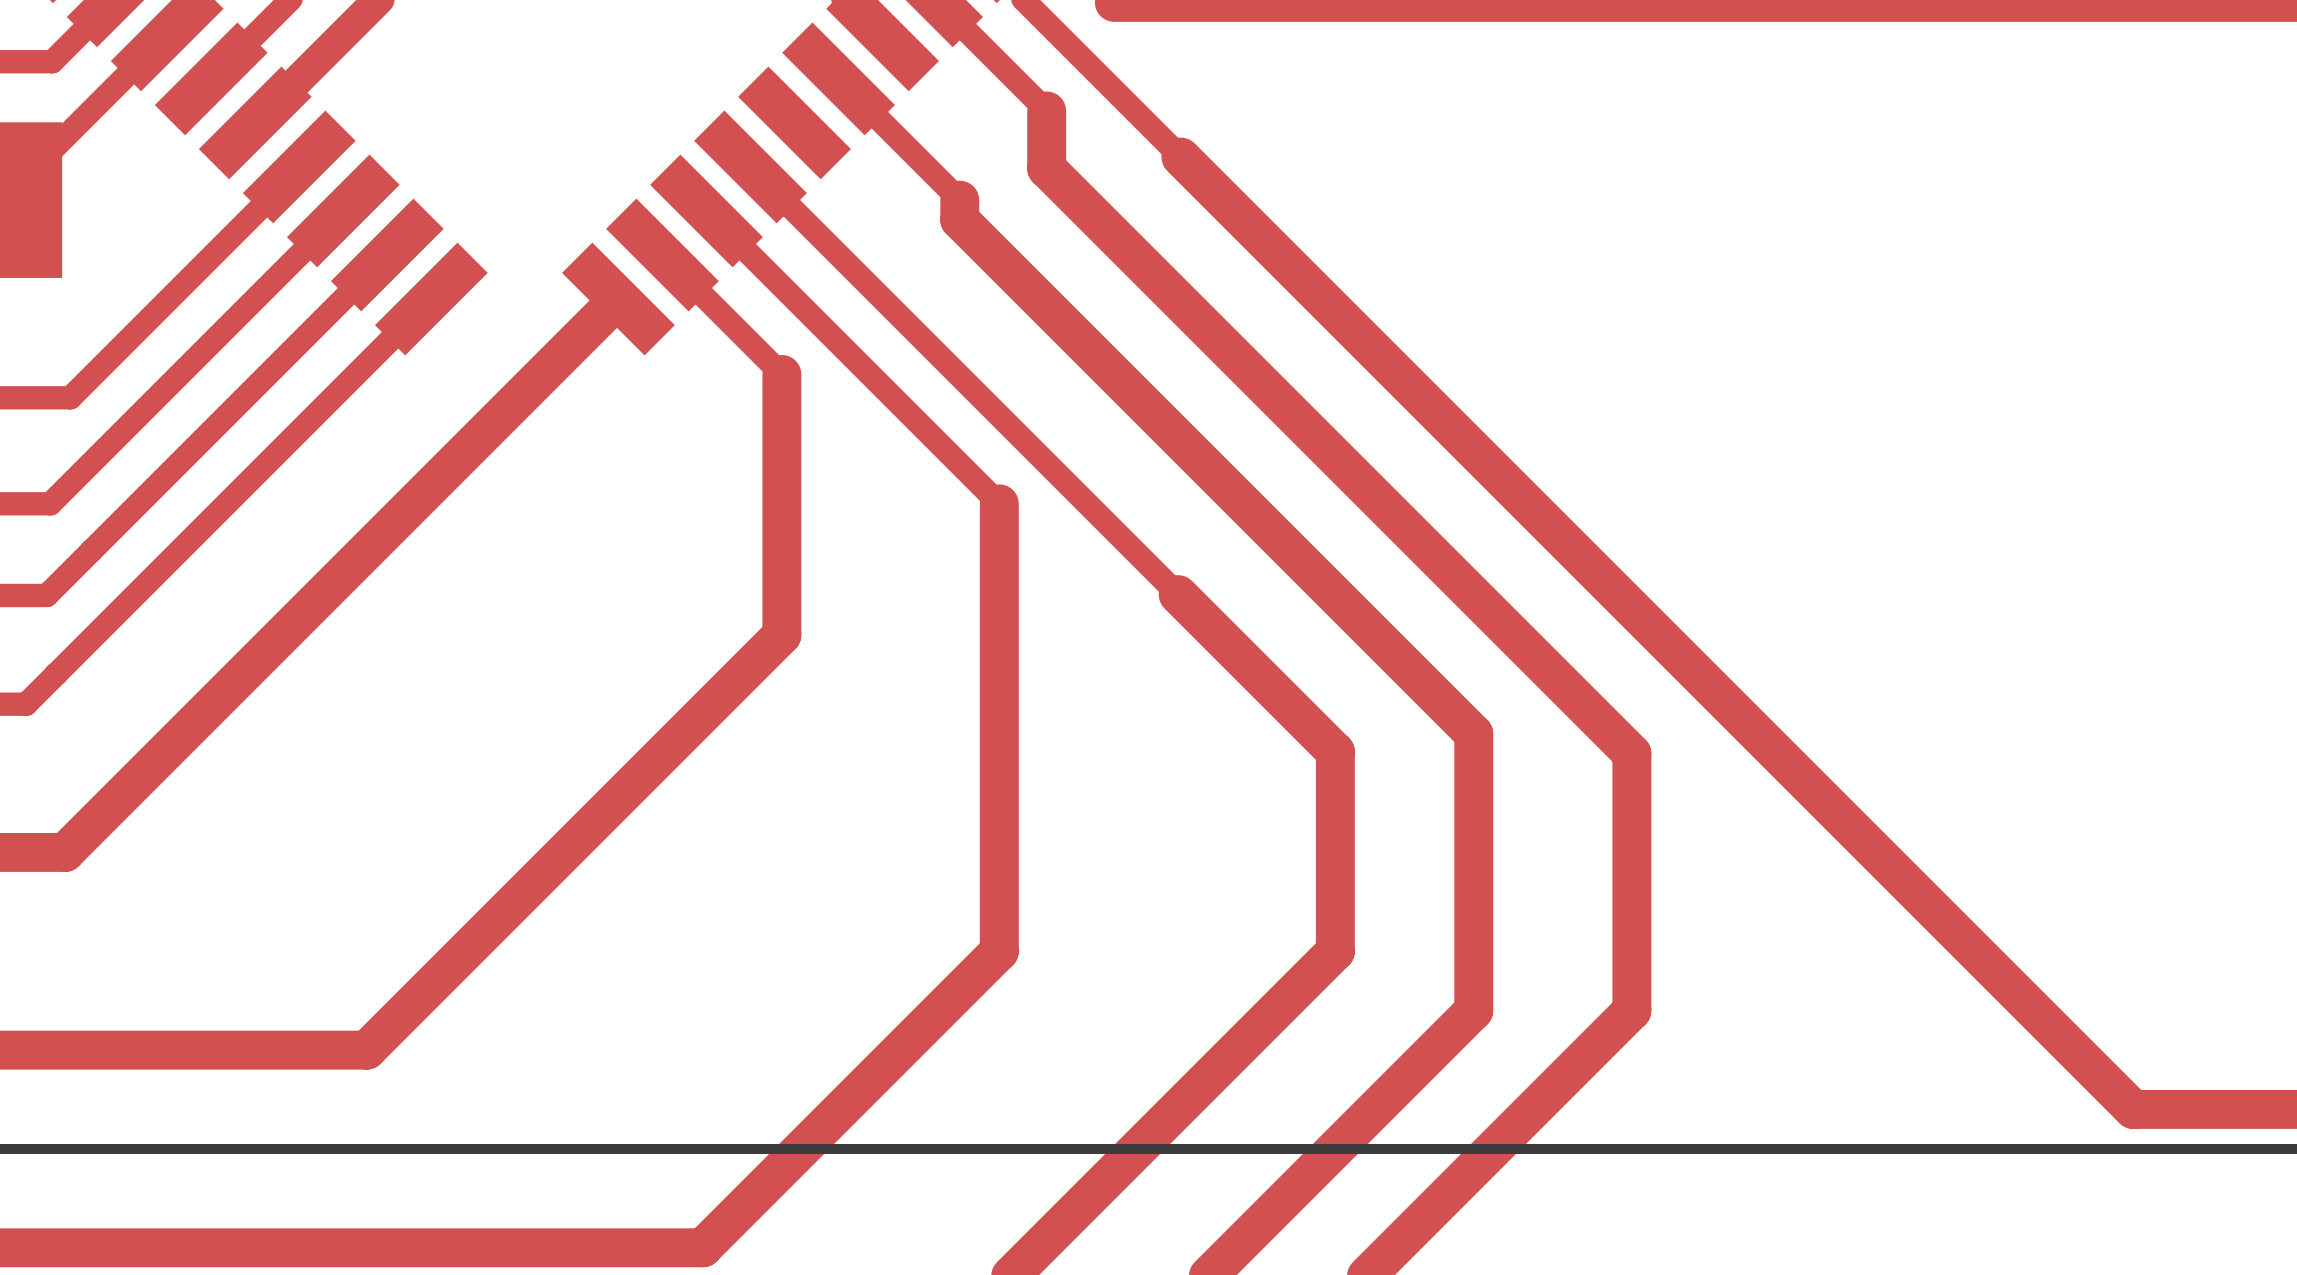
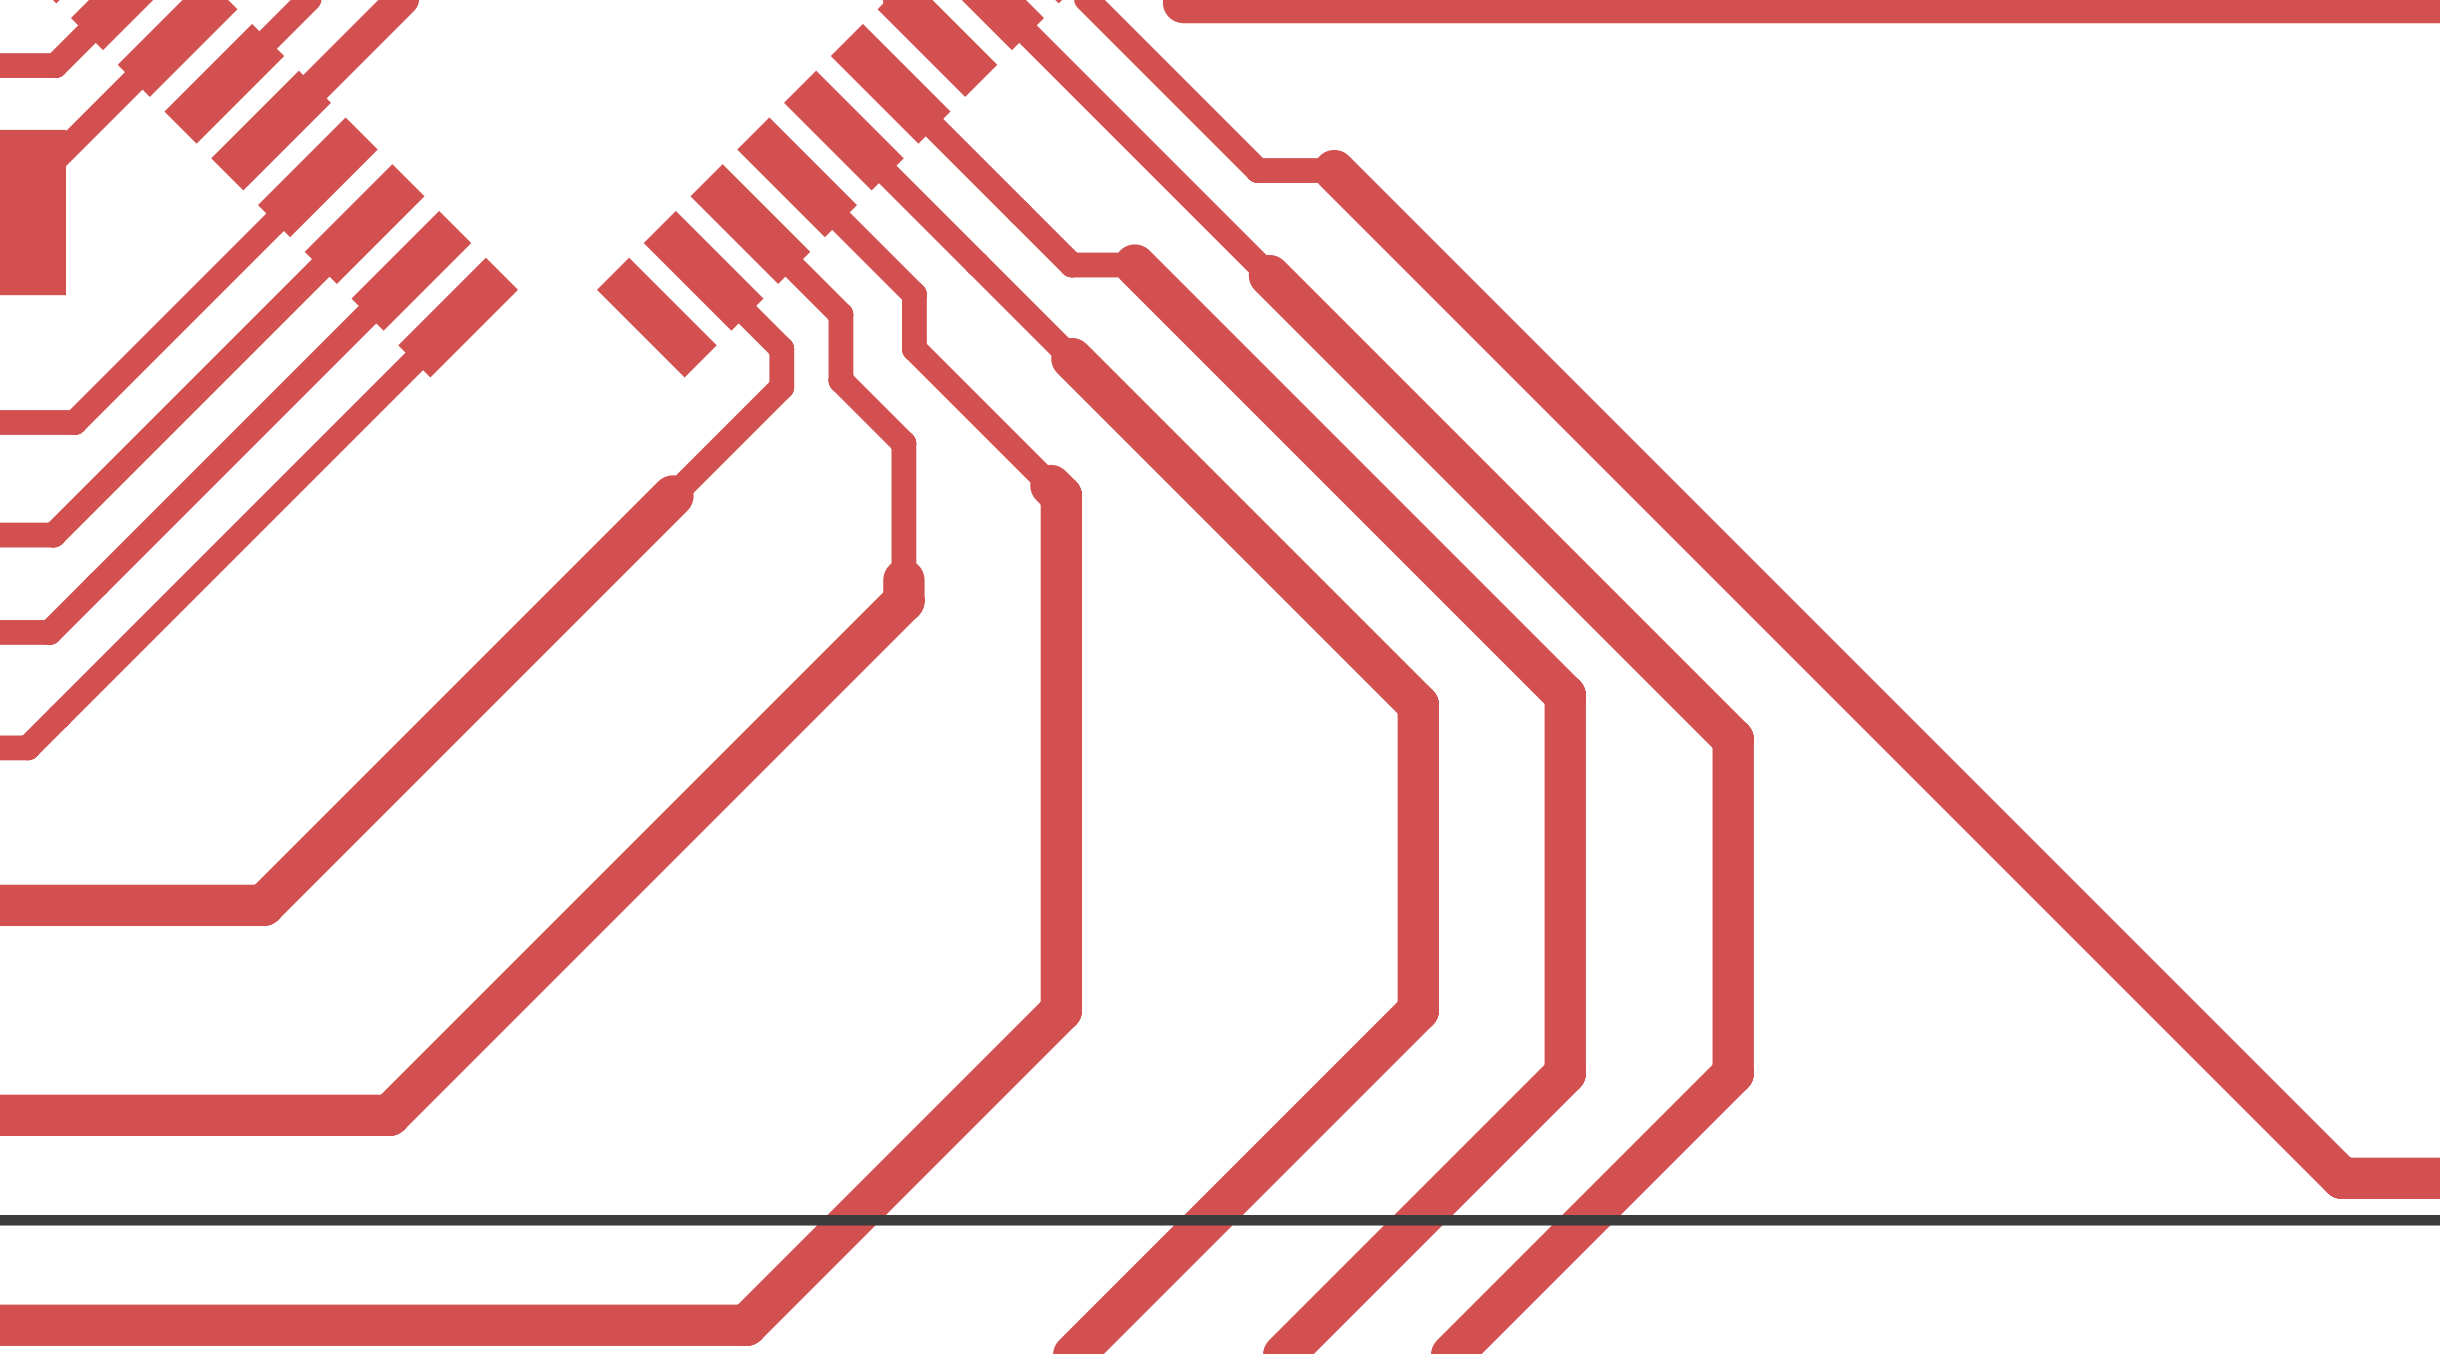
top track: (1046, 110) (1046, 168) (1631, 753) -> (1111, 117) (1733, 739) (1733, 800)
top track: (1180, 156) (2133, 1109) (2205, 1109) -> (1257, 170) (1334, 170) (2342, 1178)
top track: (959, 200) (959, 219) (1473, 733) -> (1019, 212) (1071, 265) (1134, 265) (1565, 695) (1565, 779)
top track: (860, 277) (1197, 613) -> none
top track: (791, 296) (999, 503) -> (914, 294) (914, 349) (1061, 495) (1061, 535)
top track: (618, 299) (65, 852) -> (781, 349) (781, 387) (263, 905) (69, 905)
top track: (736, 328) (781, 374) (781, 635) -> (840, 314) (840, 380) (903, 443) (903, 600) (830, 674)
top track: (1178, 594) (1335, 751) -> (843, 130) (1418, 704) (1418, 798)

